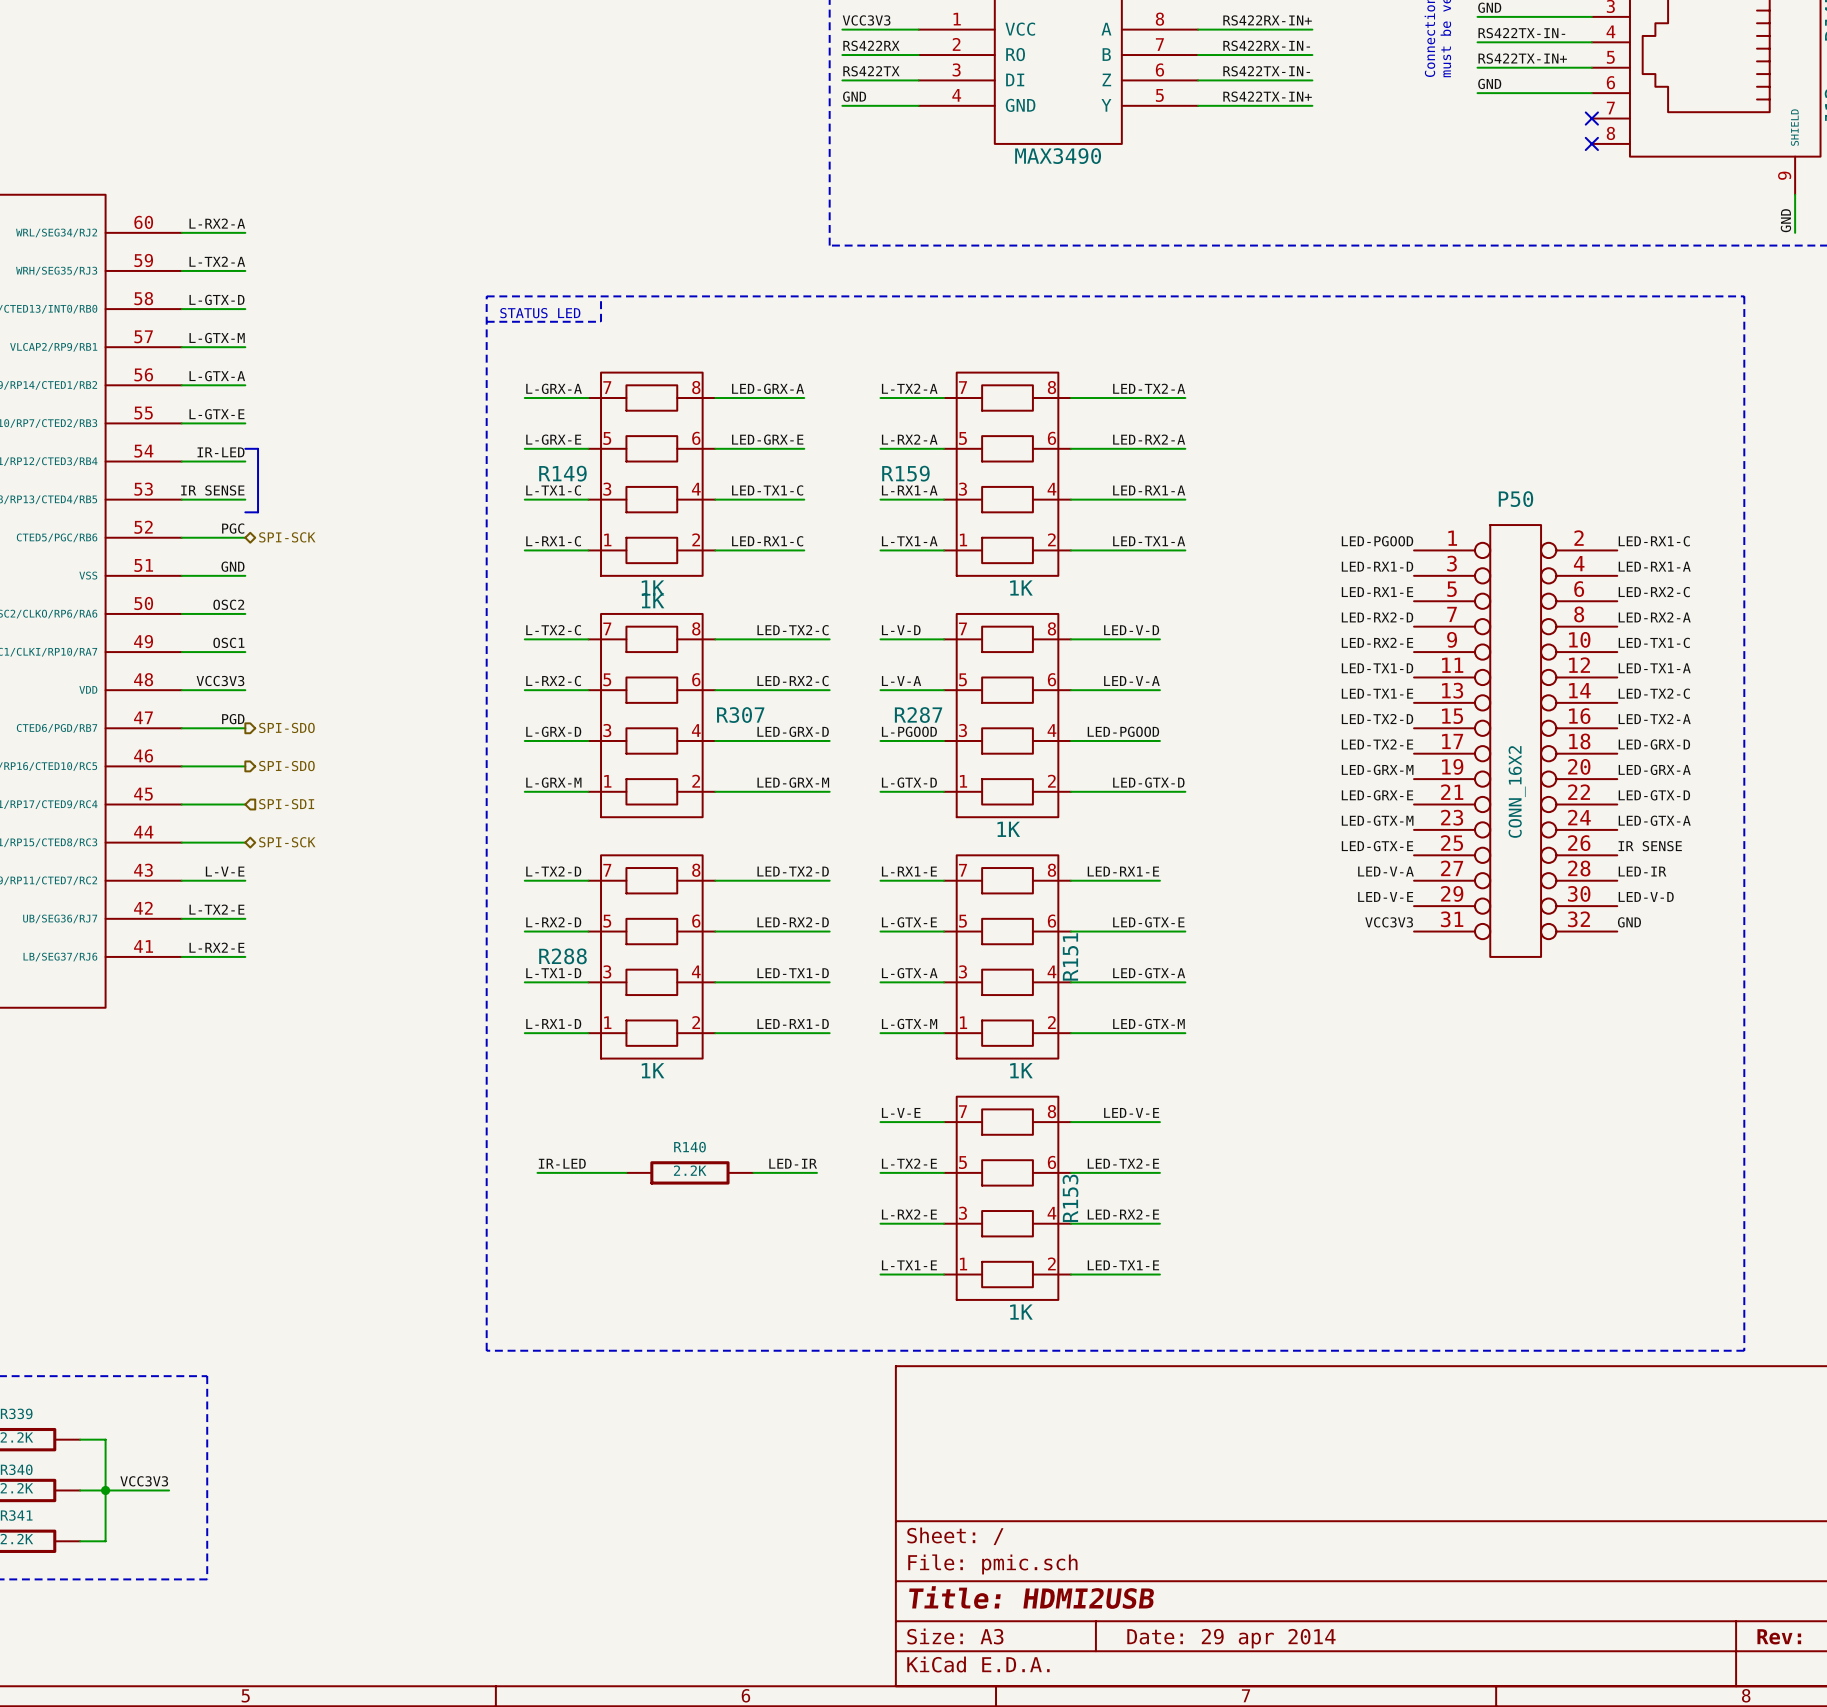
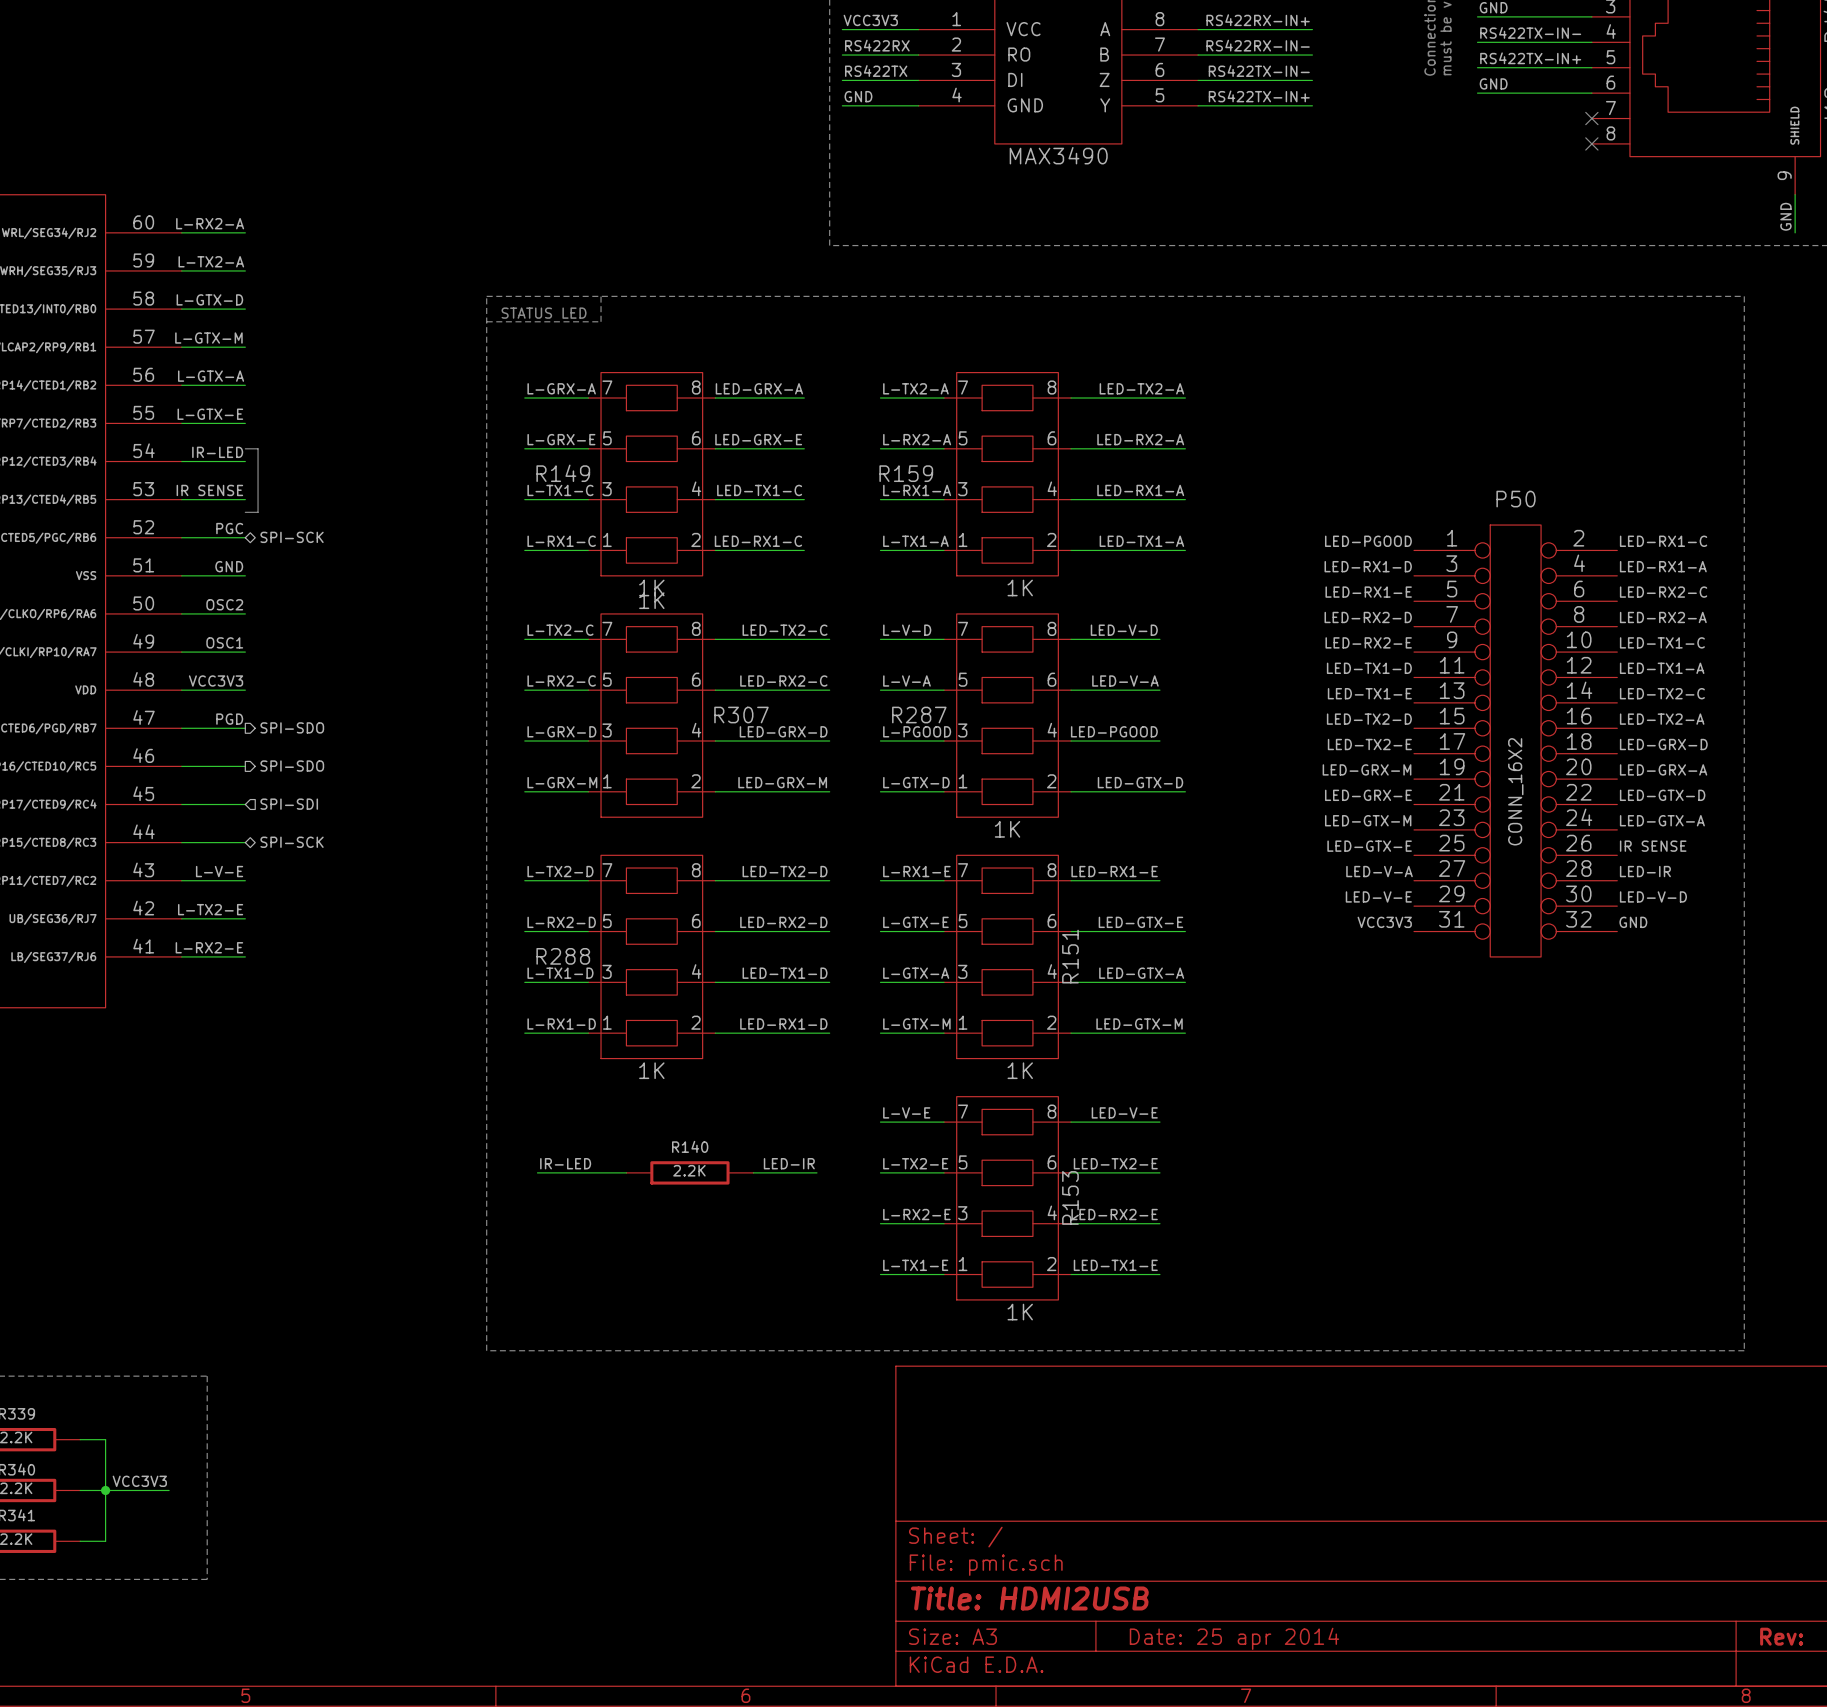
title block: Date: 29 apr 2014 (1231, 1638) -> Date: 25 apr 2014 (1234, 1638)

